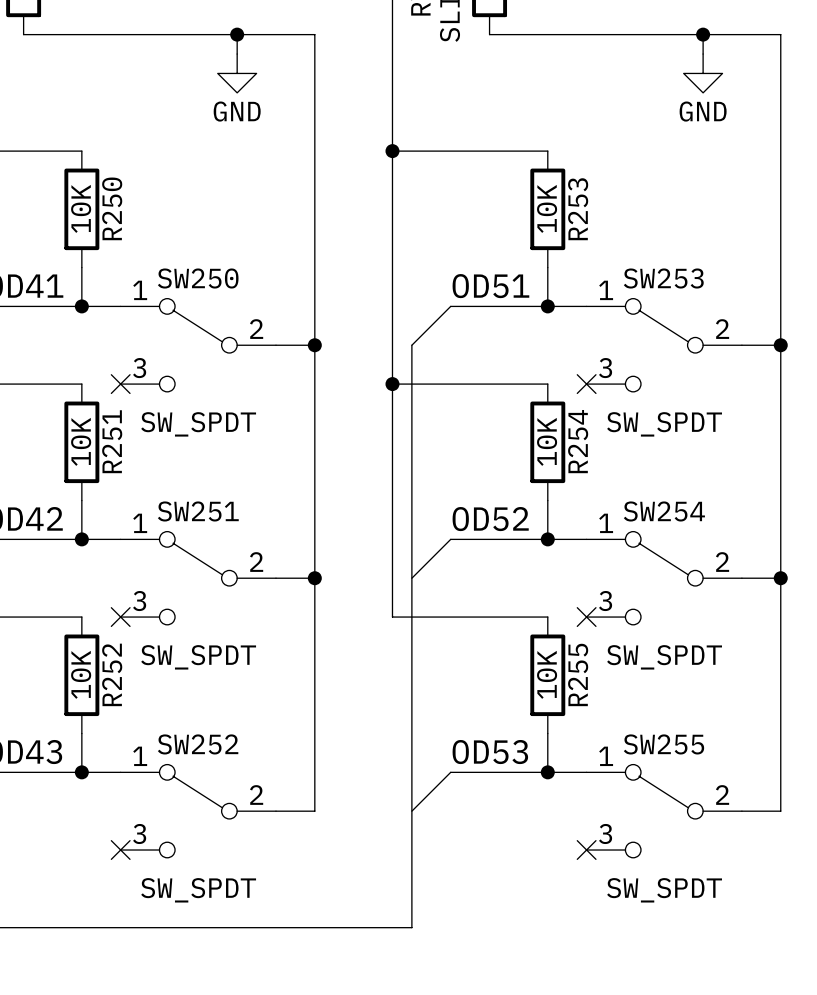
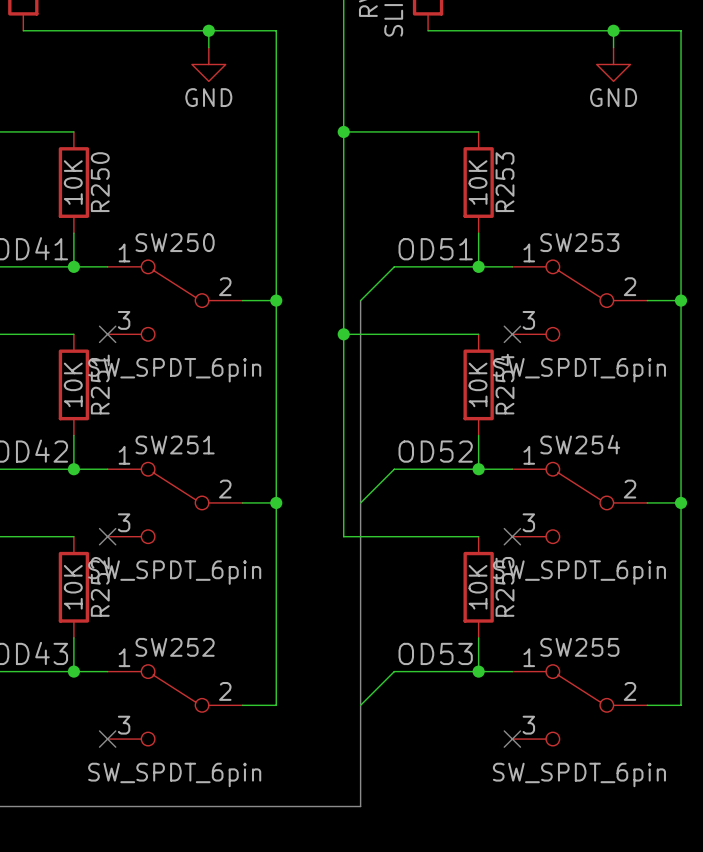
SW250 value: SW_SPDT (198, 424) -> SW_SPDT_6pin (174, 370)
SW253 value: SW_SPDT (664, 424) -> SW_SPDT_6pin (579, 370)
SW251 value: SW_SPDT (198, 657) -> SW_SPDT_6pin (174, 572)
SW254 value: SW_SPDT (664, 657) -> SW_SPDT_6pin (579, 572)
SW252 value: SW_SPDT (198, 890) -> SW_SPDT_6pin (174, 774)
SW255 value: SW_SPDT (664, 890) -> SW_SPDT_6pin (579, 774)

